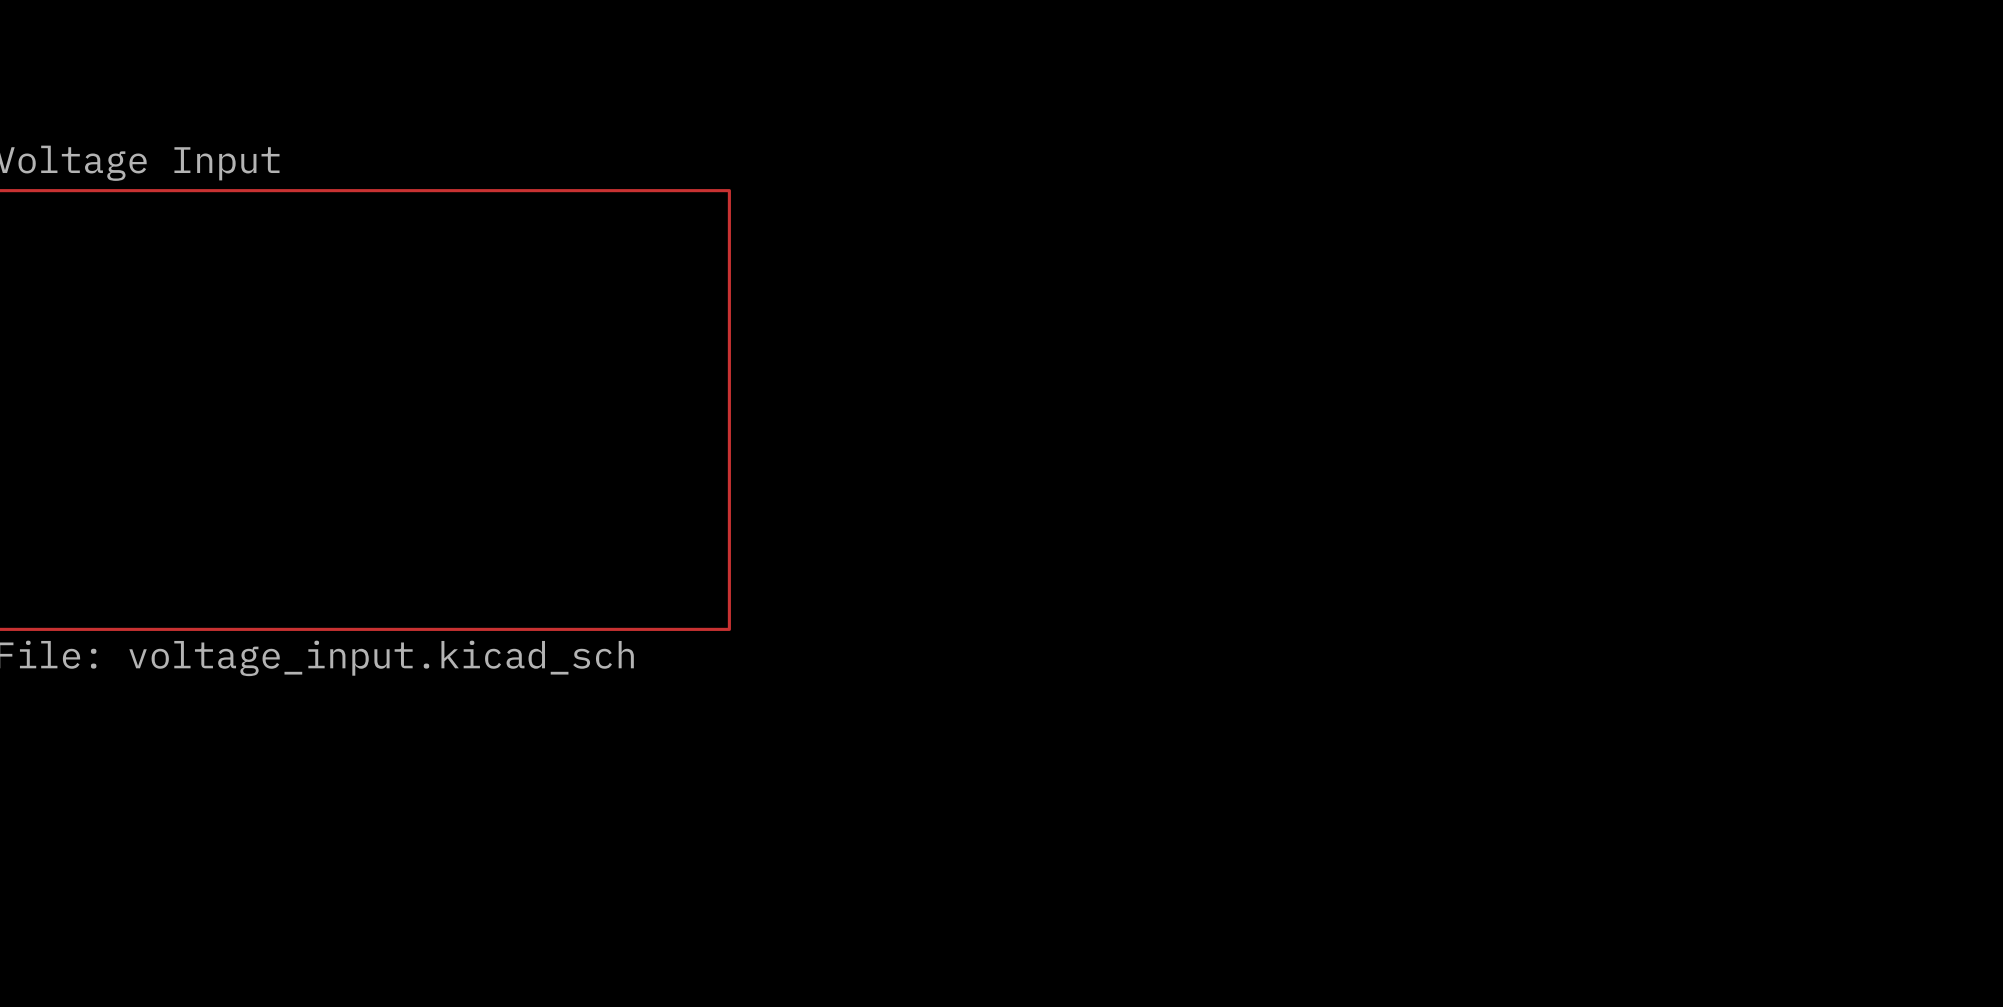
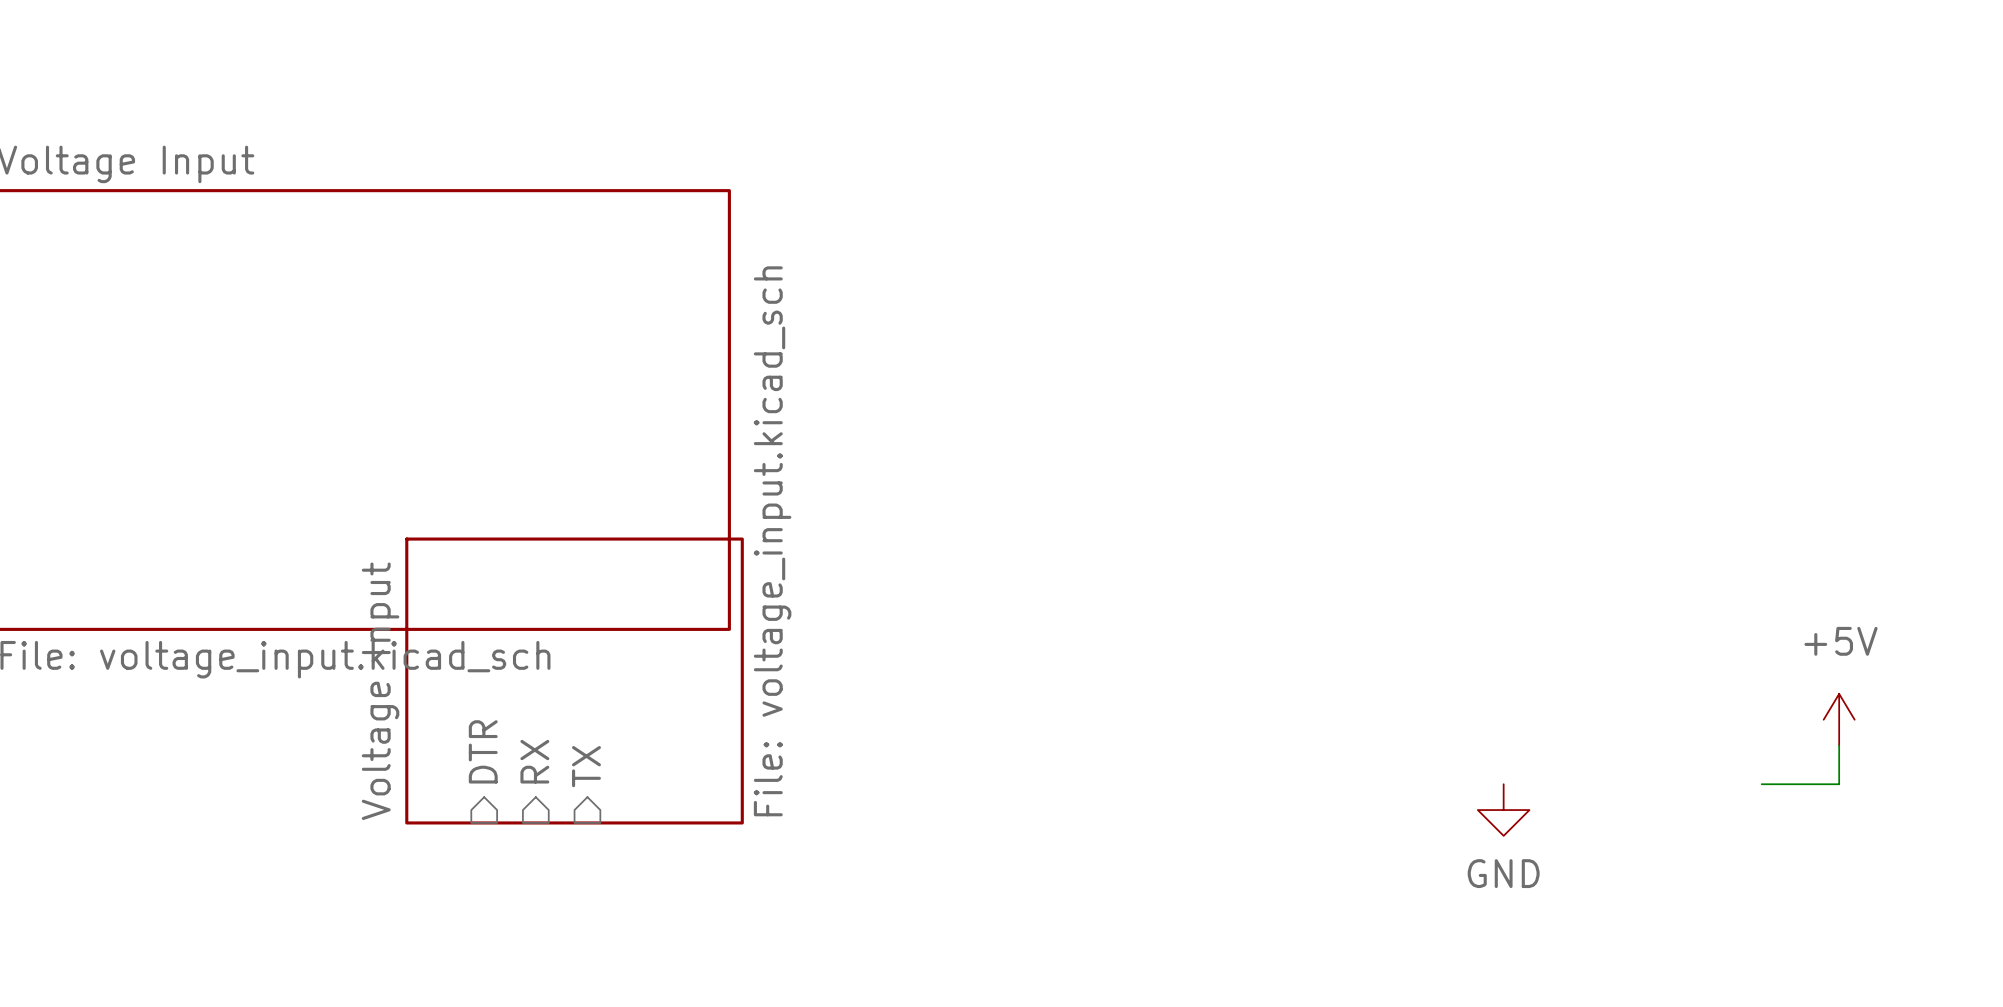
sheet Voltage Input: none -> File: voltage_input.kicad_sch (574, 681)
power symbol: none -> +5V (1839, 719)
wire: none -> (1839, 745) (1839, 784) (1761, 784)
sheet pin: none -> DTR (483, 751)
sheet pin: none -> RX (534, 761)
sheet pin: none -> TX (586, 766)
power symbol: none -> GND (1503, 810)

